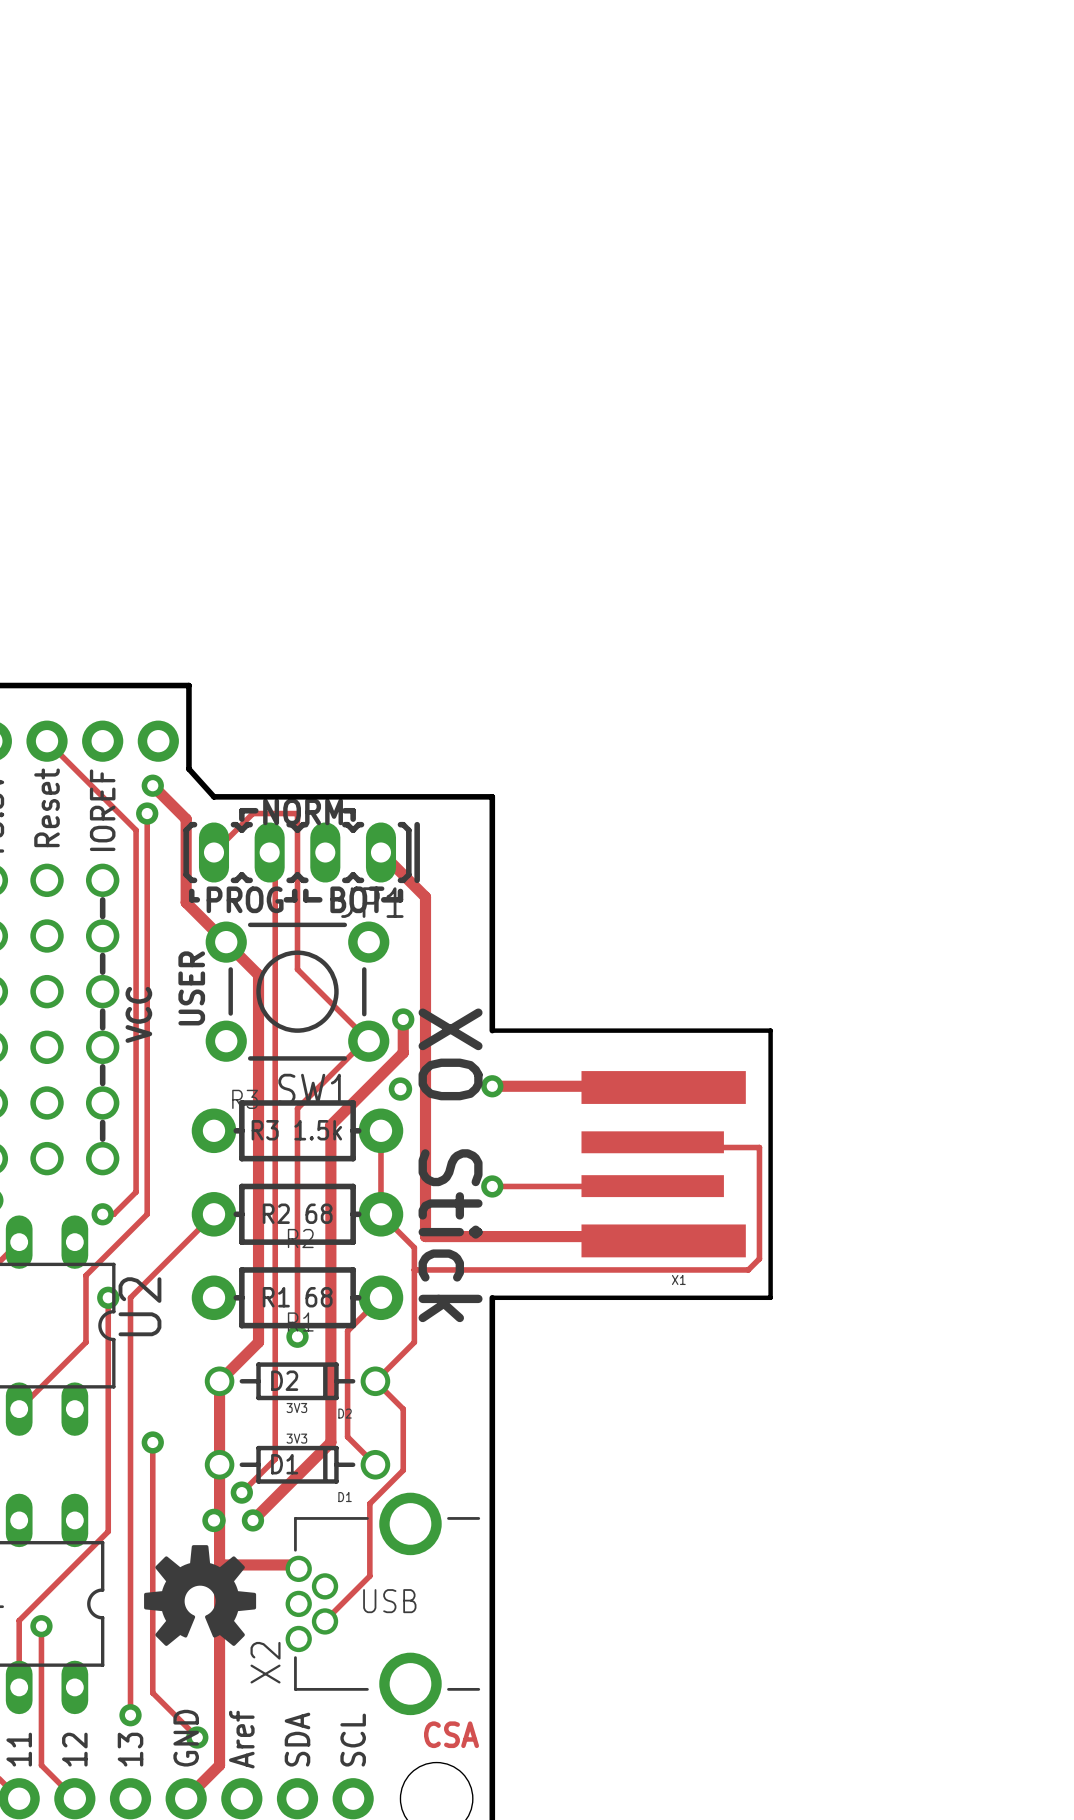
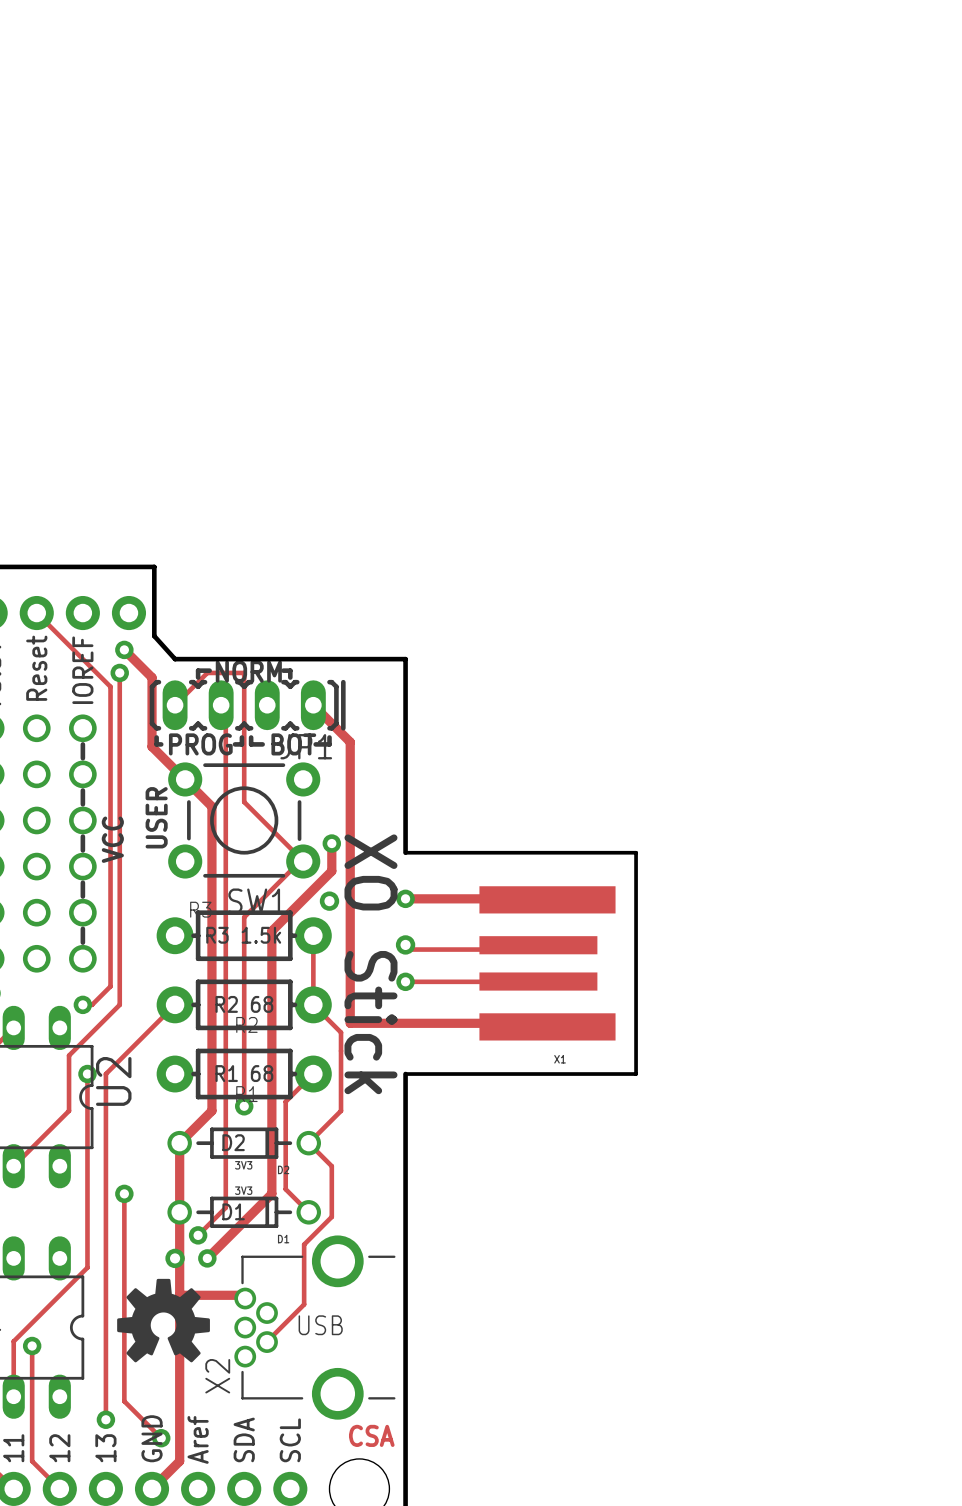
via: none -> (405, 944)
track: (653, 1147) (759, 1147) (759, 1258) (748, 1269) (414, 1269) -> (539, 949) (410, 949) (405, 944)

